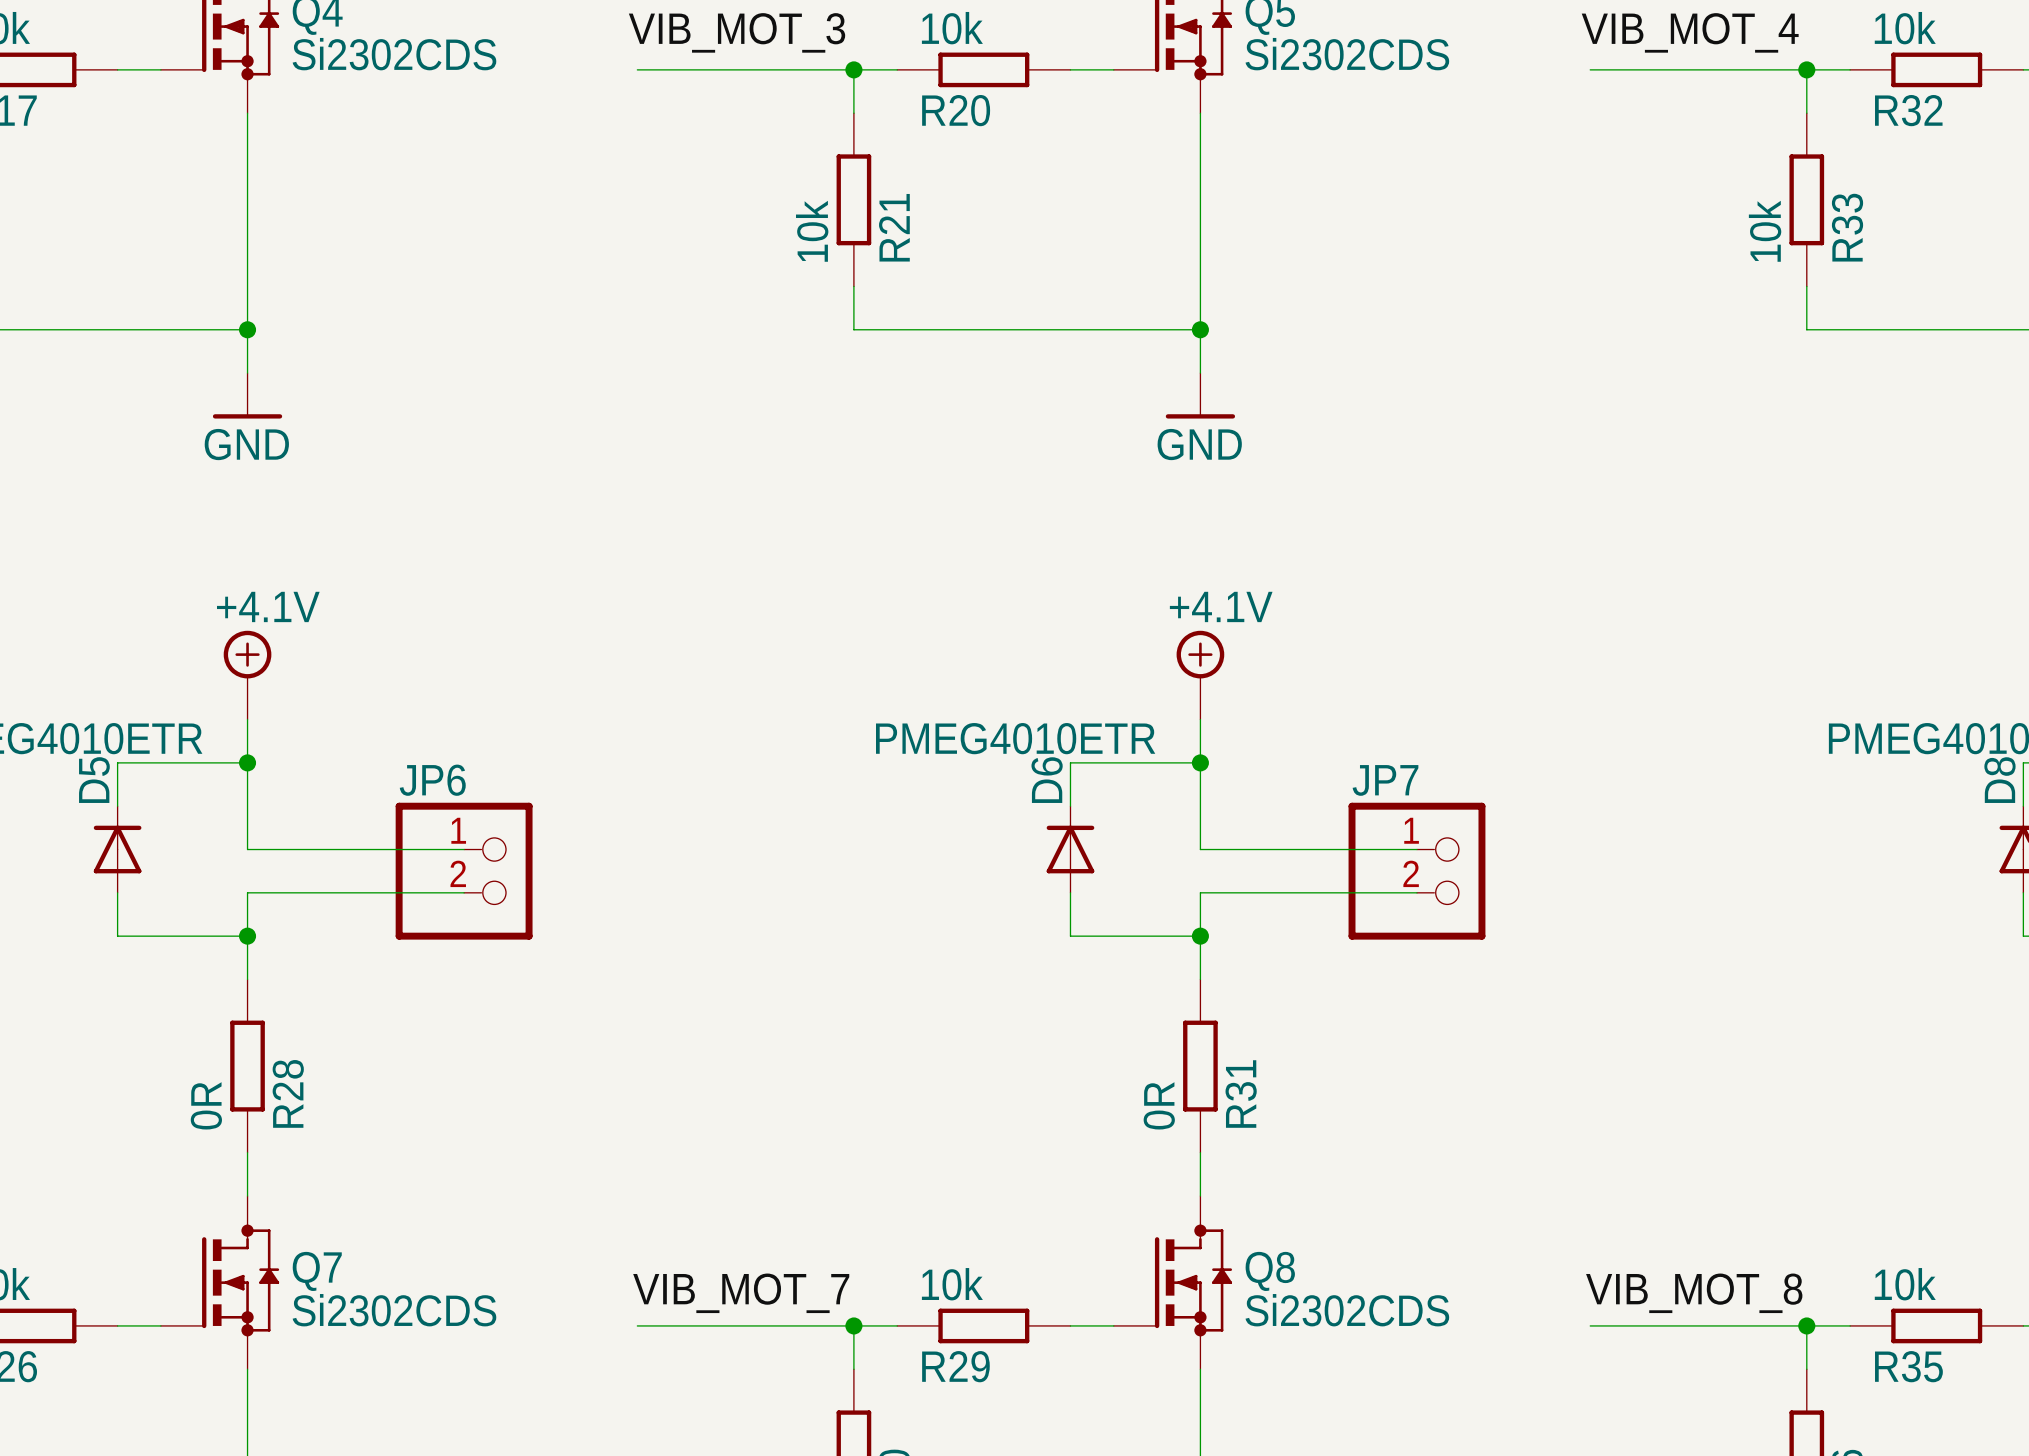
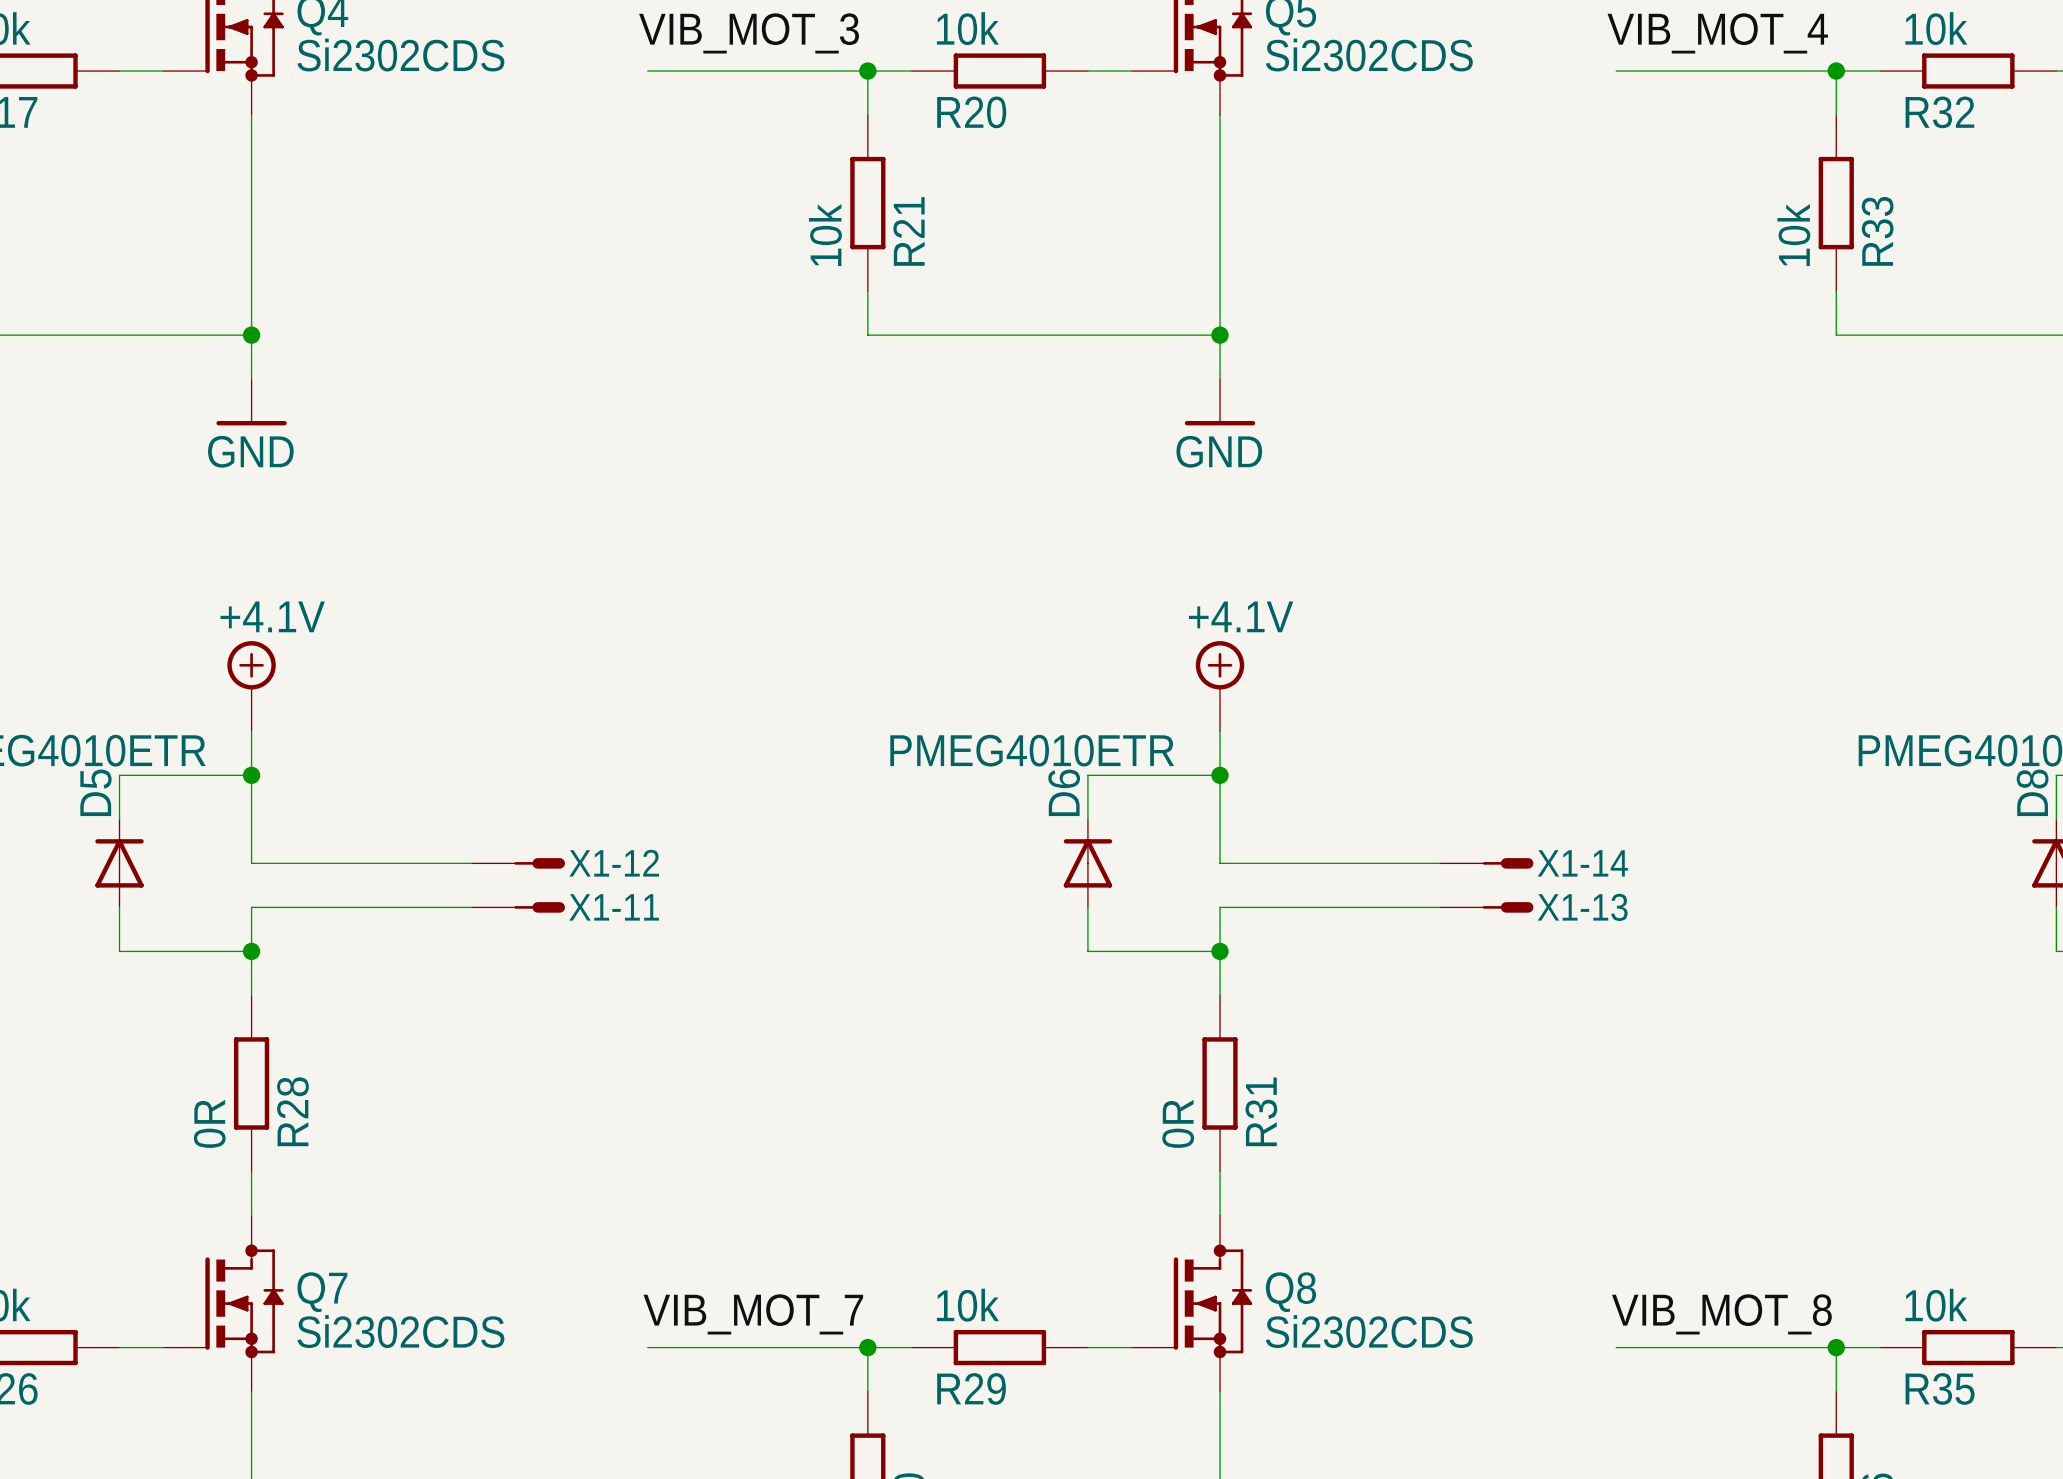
X1-12: none -> (518, 863)
X1-14: none -> (1486, 863)
JP6: (464, 871) -> none
JP7: (1416, 871) -> none
X1-11: none -> (518, 907)
X1-13: none -> (1486, 907)

